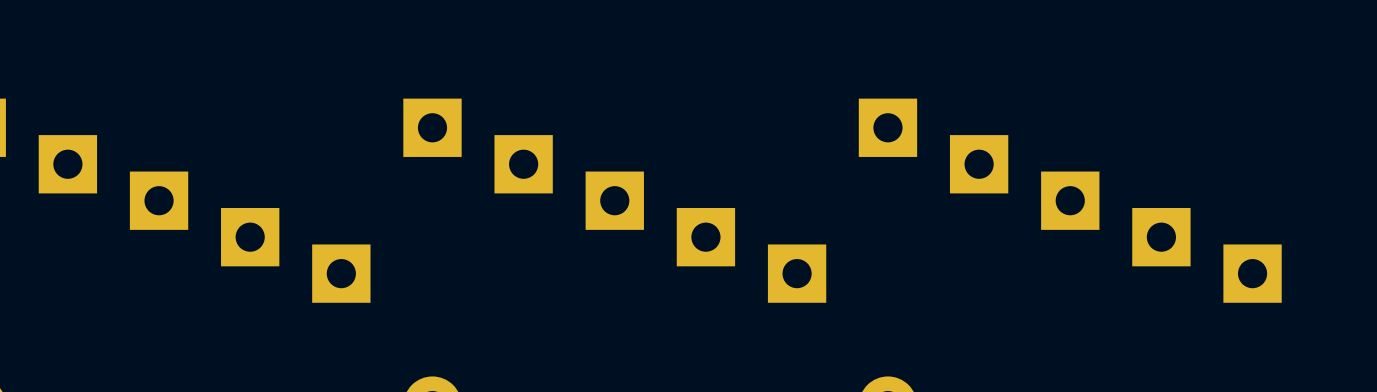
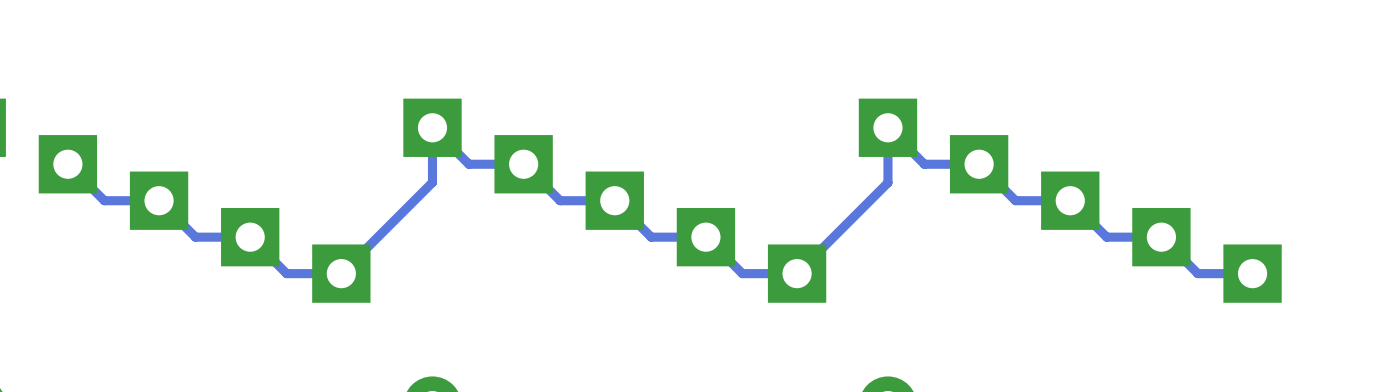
bottom track: none -> (67, 164) (104, 200) (159, 200) (195, 237) (250, 237) (286, 273) (341, 273) (432, 182) (432, 127) (468, 164) (523, 164) (560, 200) (614, 200) (651, 237) (705, 237) (742, 273) (797, 273) (887, 182) (887, 127) (924, 164) (979, 164) (1015, 200) (1070, 200) (1106, 237) (1161, 237) (1197, 273) (1252, 273)

